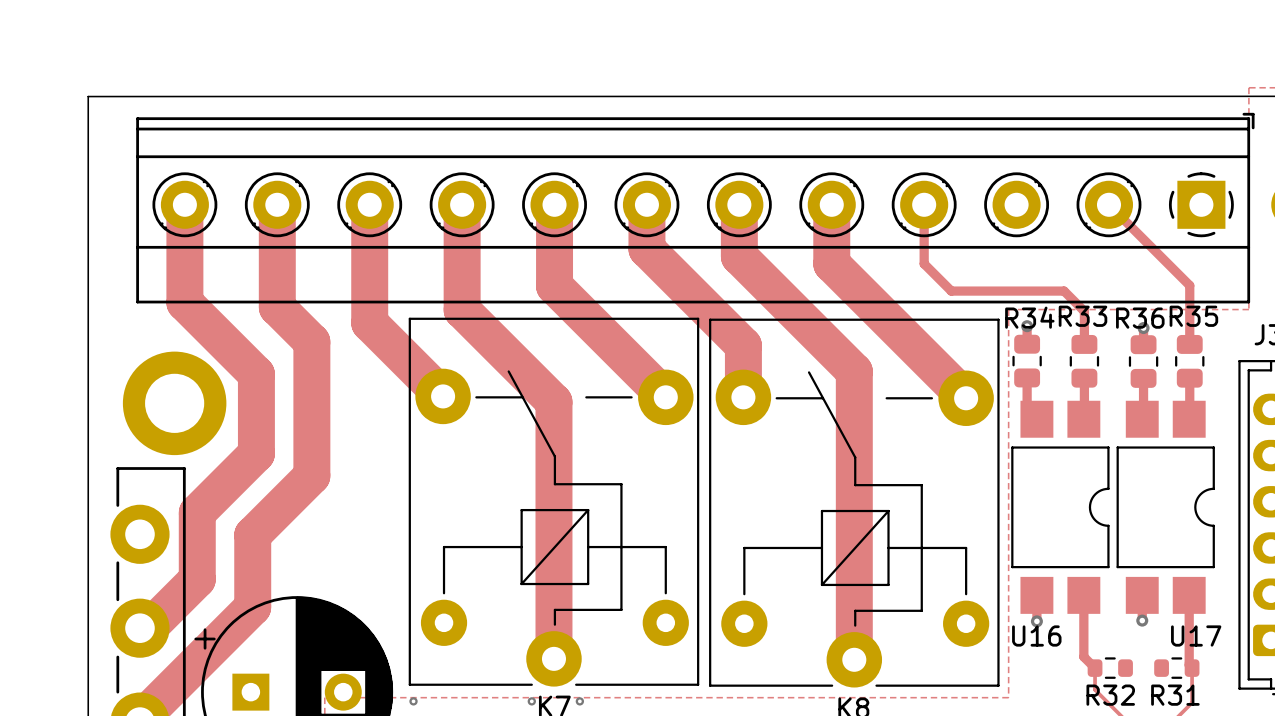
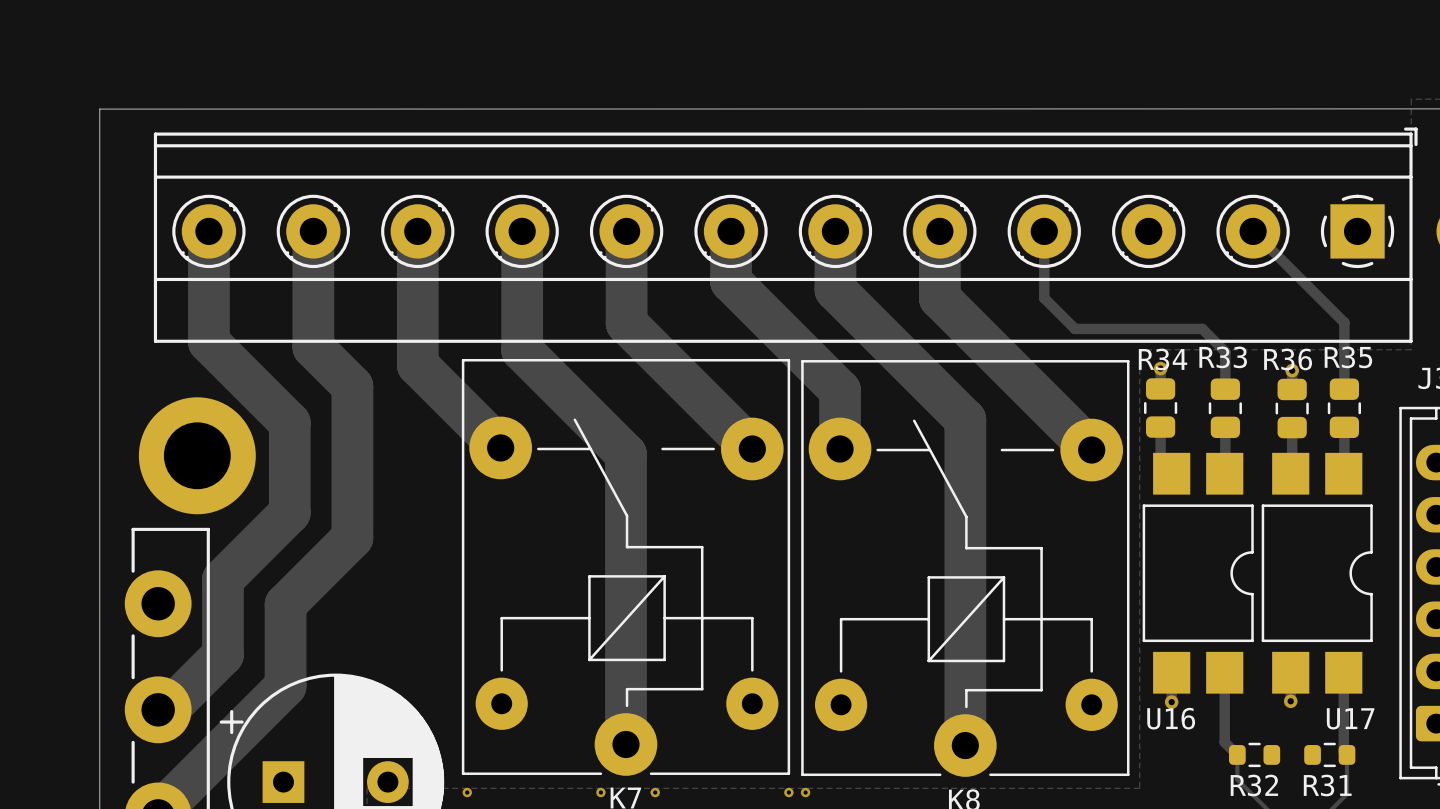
via: none -> (788, 792)
via: none -> (805, 792)

